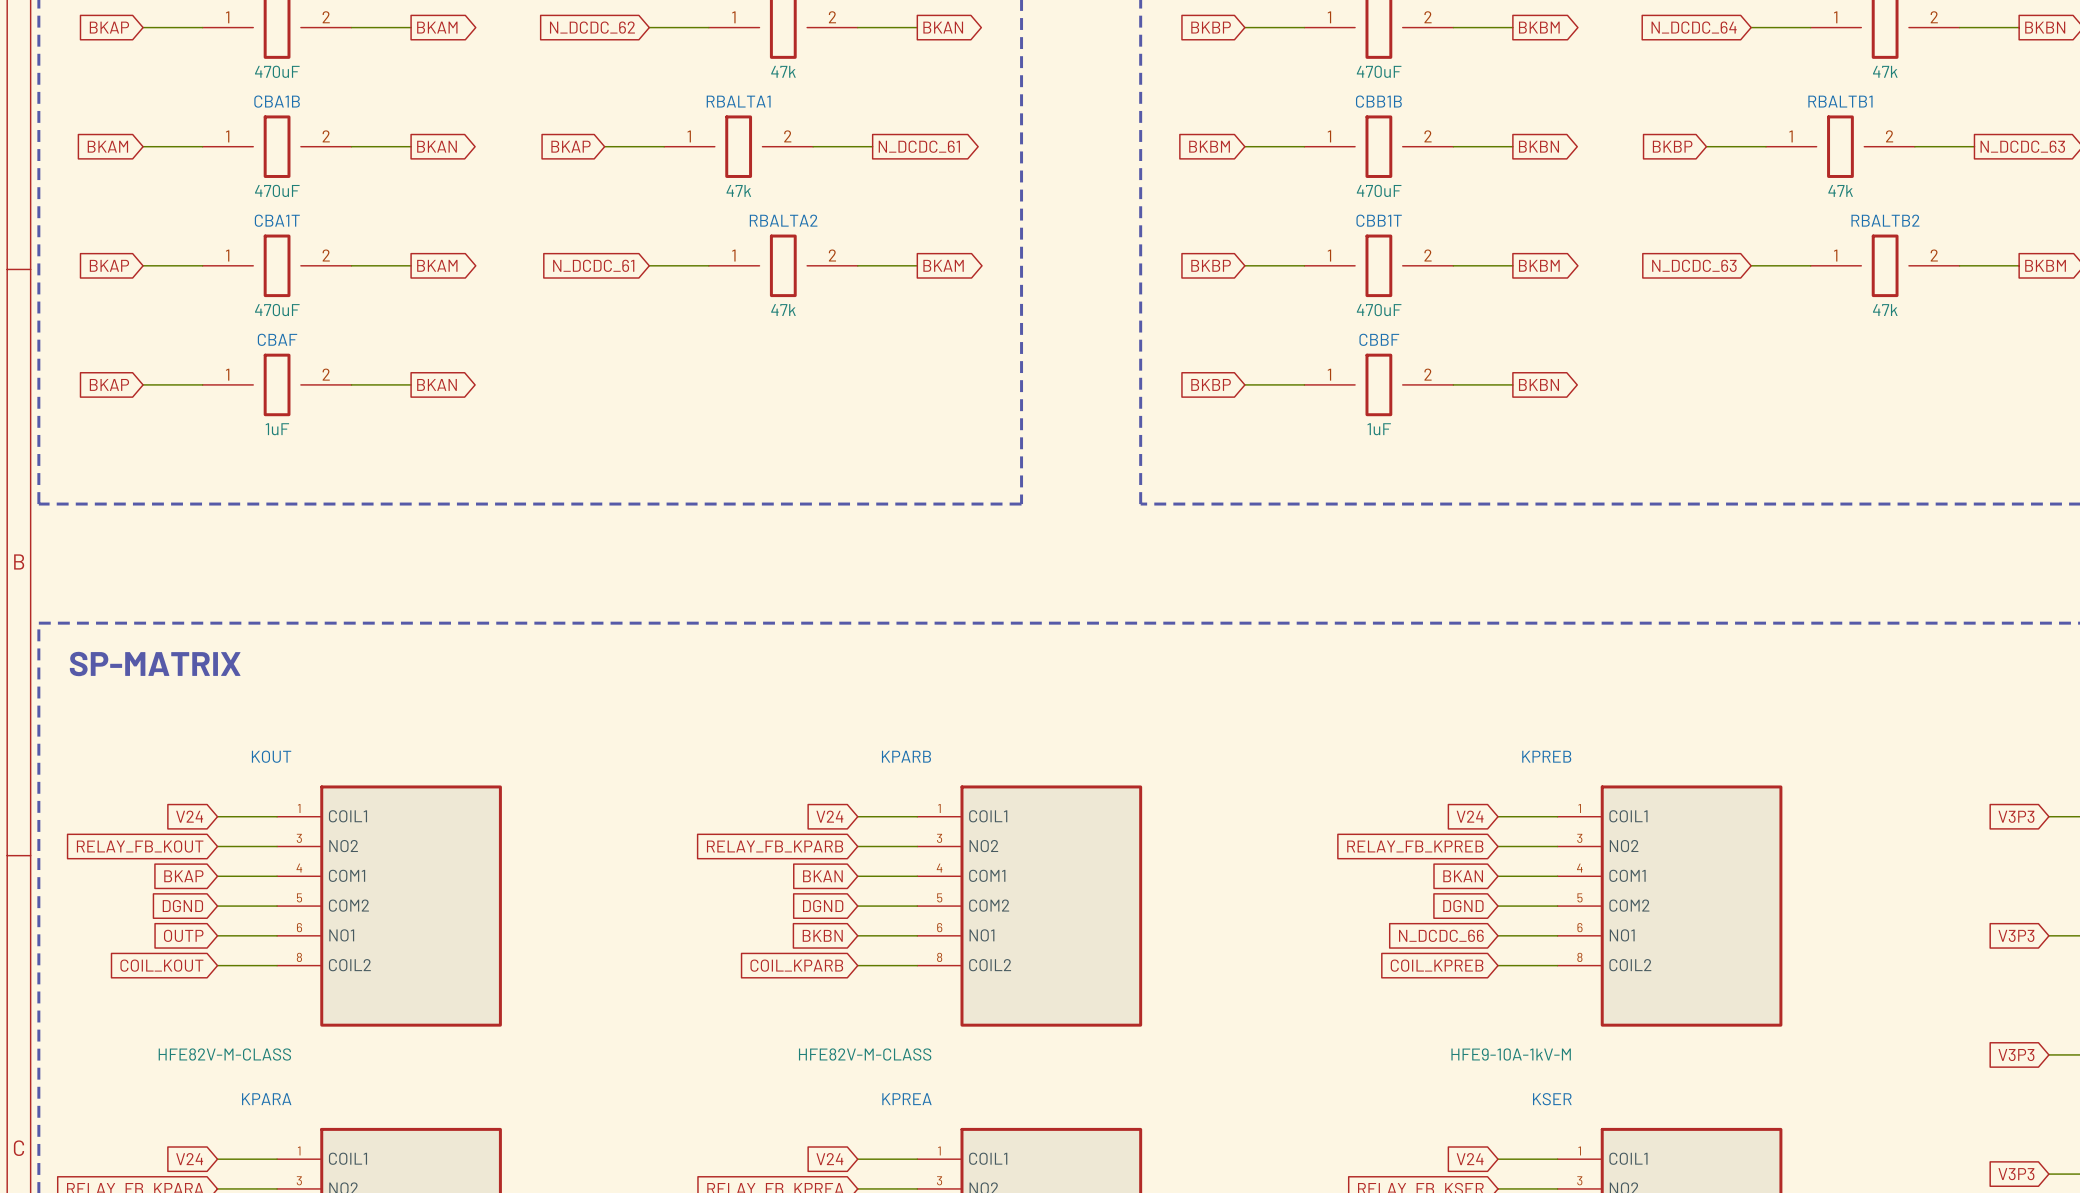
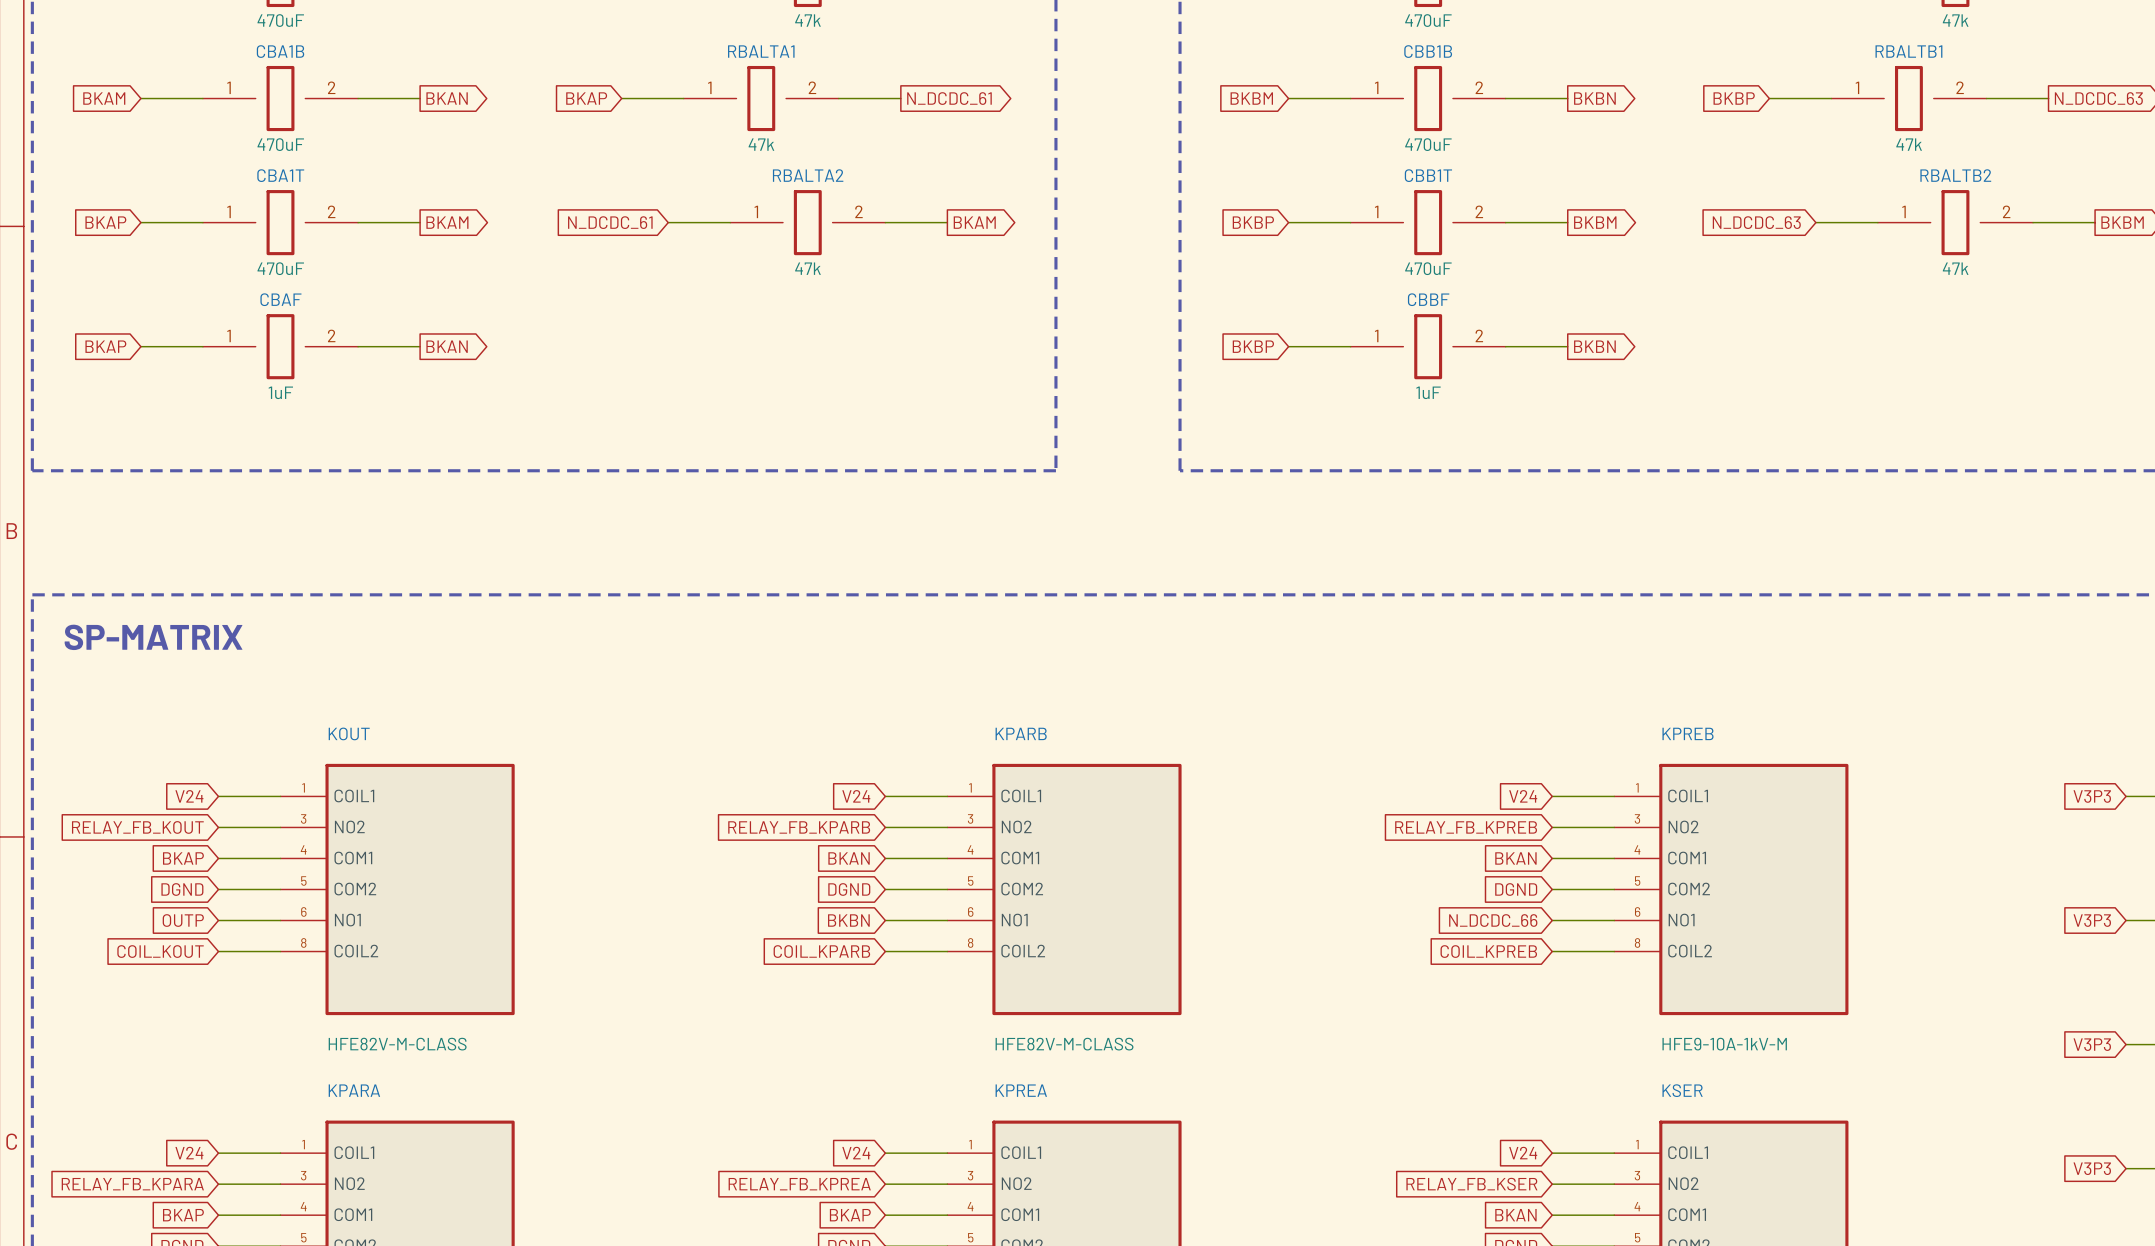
KOUT name position: KOUT (271, 756) -> KOUT (349, 733)
KPARB name position: KPARB (906, 756) -> KPARB (1021, 733)
KPREB name position: KPREB (1546, 756) -> KPREB (1688, 733)
KOUT value position: HFE82V-M-CLASS (224, 1054) -> HFE82V-M-CLASS (397, 1044)
KPARB value position: HFE82V-M-CLASS (865, 1054) -> HFE82V-M-CLASS (1064, 1044)
KPREB value position: HFE9-10A-1kV-M (1511, 1054) -> HFE9-10A-1kV-M (1724, 1044)
KPARA name position: KPARA (266, 1099) -> KPARA (354, 1090)
KPREA name position: KPREA (906, 1099) -> KPREA (1021, 1090)
KSER name position: KSER (1552, 1099) -> KSER (1682, 1090)

